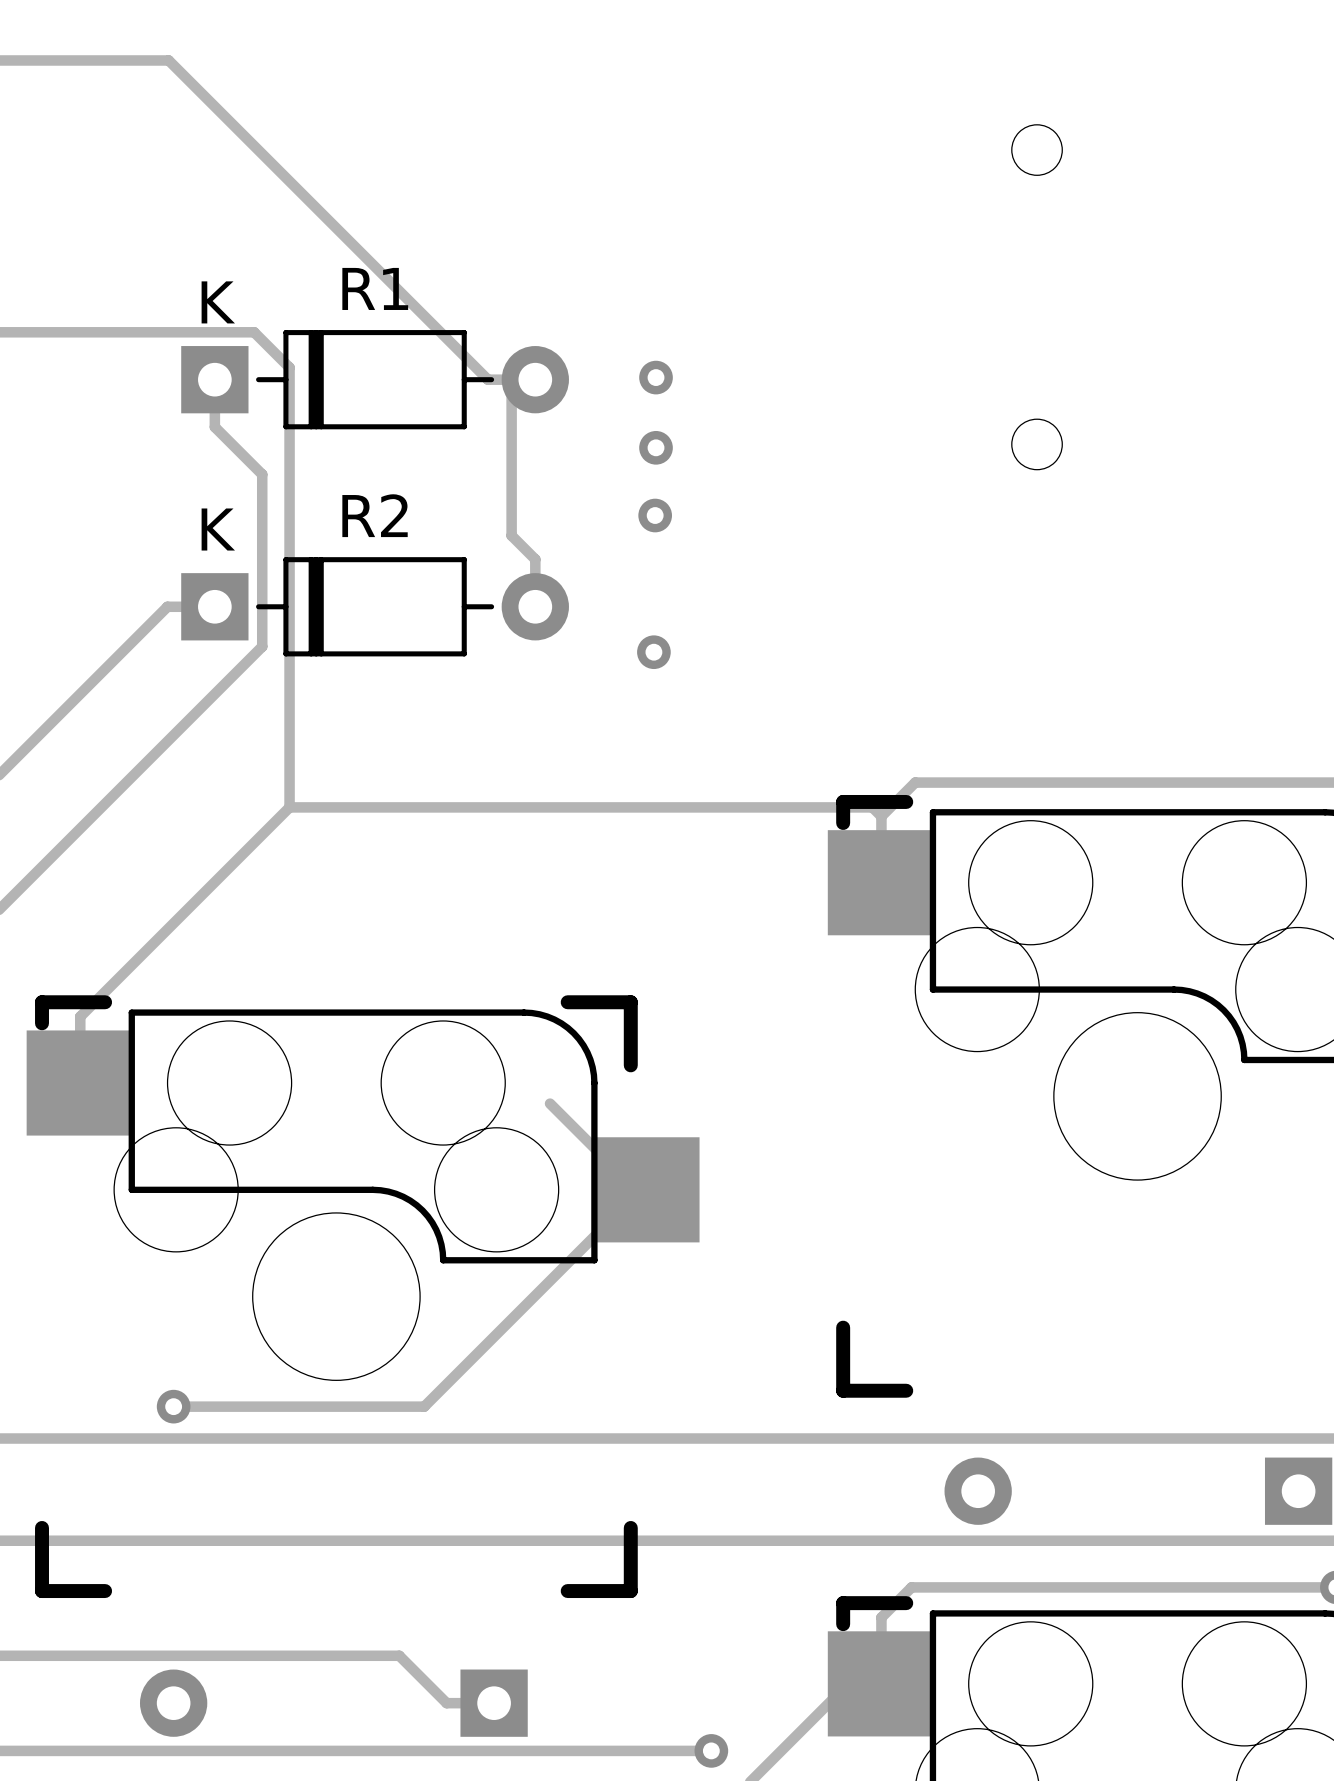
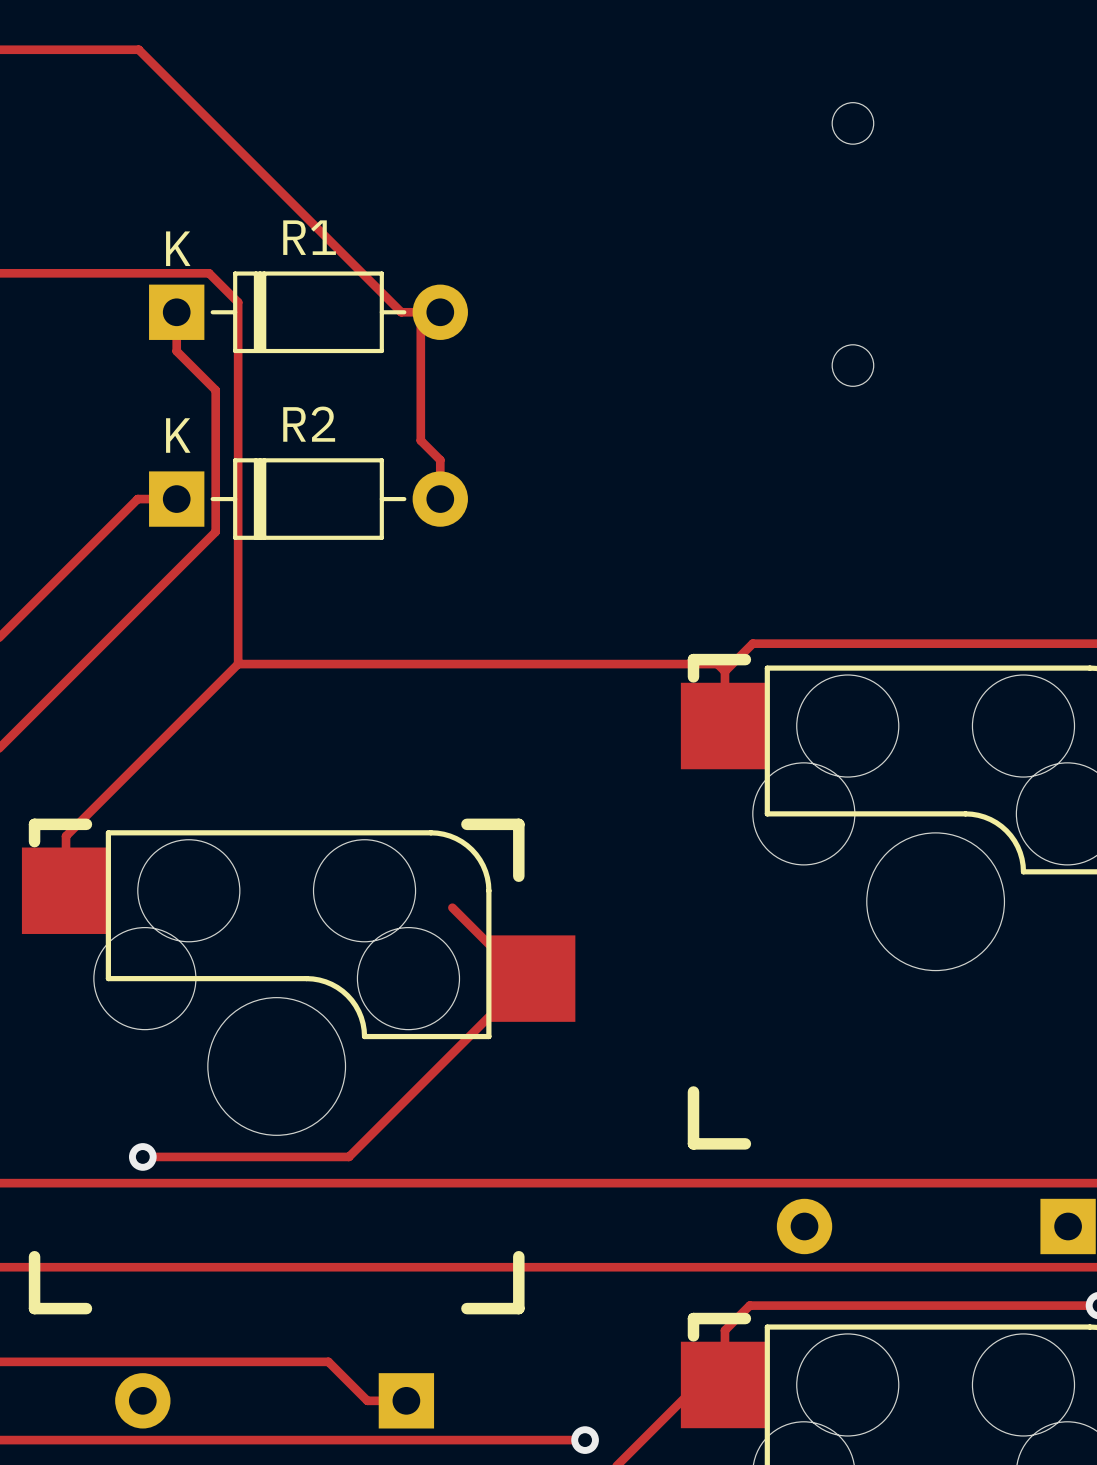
via: (656, 377) -> none
via: (656, 447) -> none
via: (655, 515) -> none
via: (653, 652) -> none

